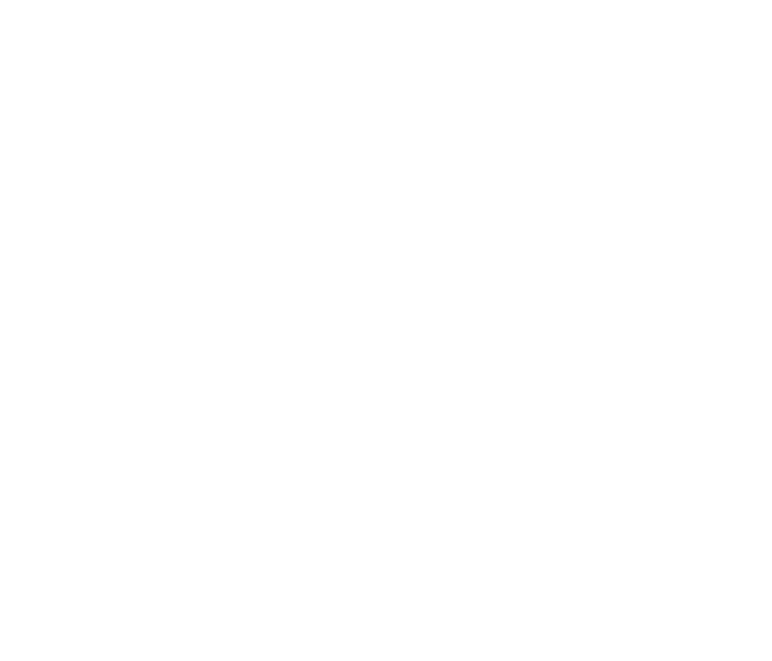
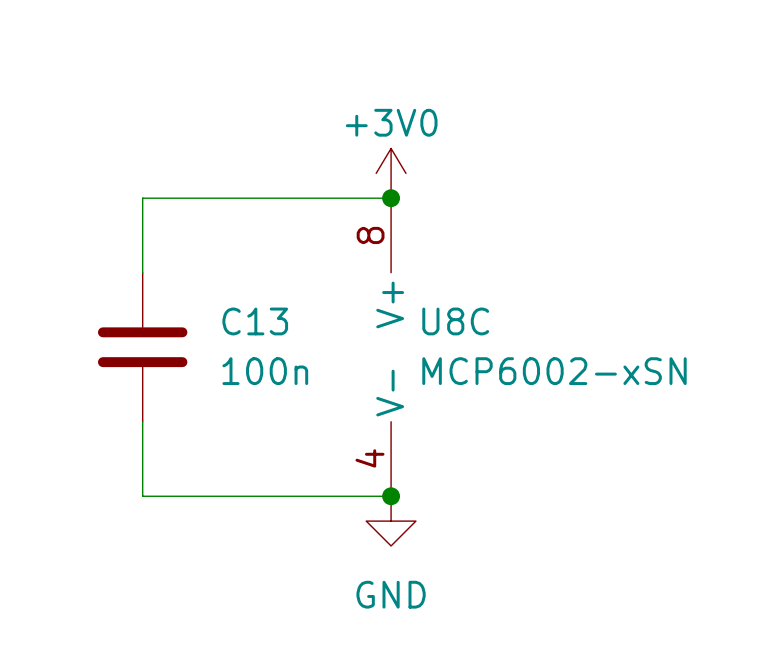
power symbol: none -> +3V0 (391, 173)
wire: none -> (391, 198) (142, 198) (142, 272)
junction: none -> (391, 198)
C13: none -> 100n (142, 347)
U8C: none -> MCP6002-xSN (391, 347)
wire: none -> (142, 421) (142, 496) (391, 496)
junction: none -> (391, 496)
power symbol: none -> GND (391, 521)

